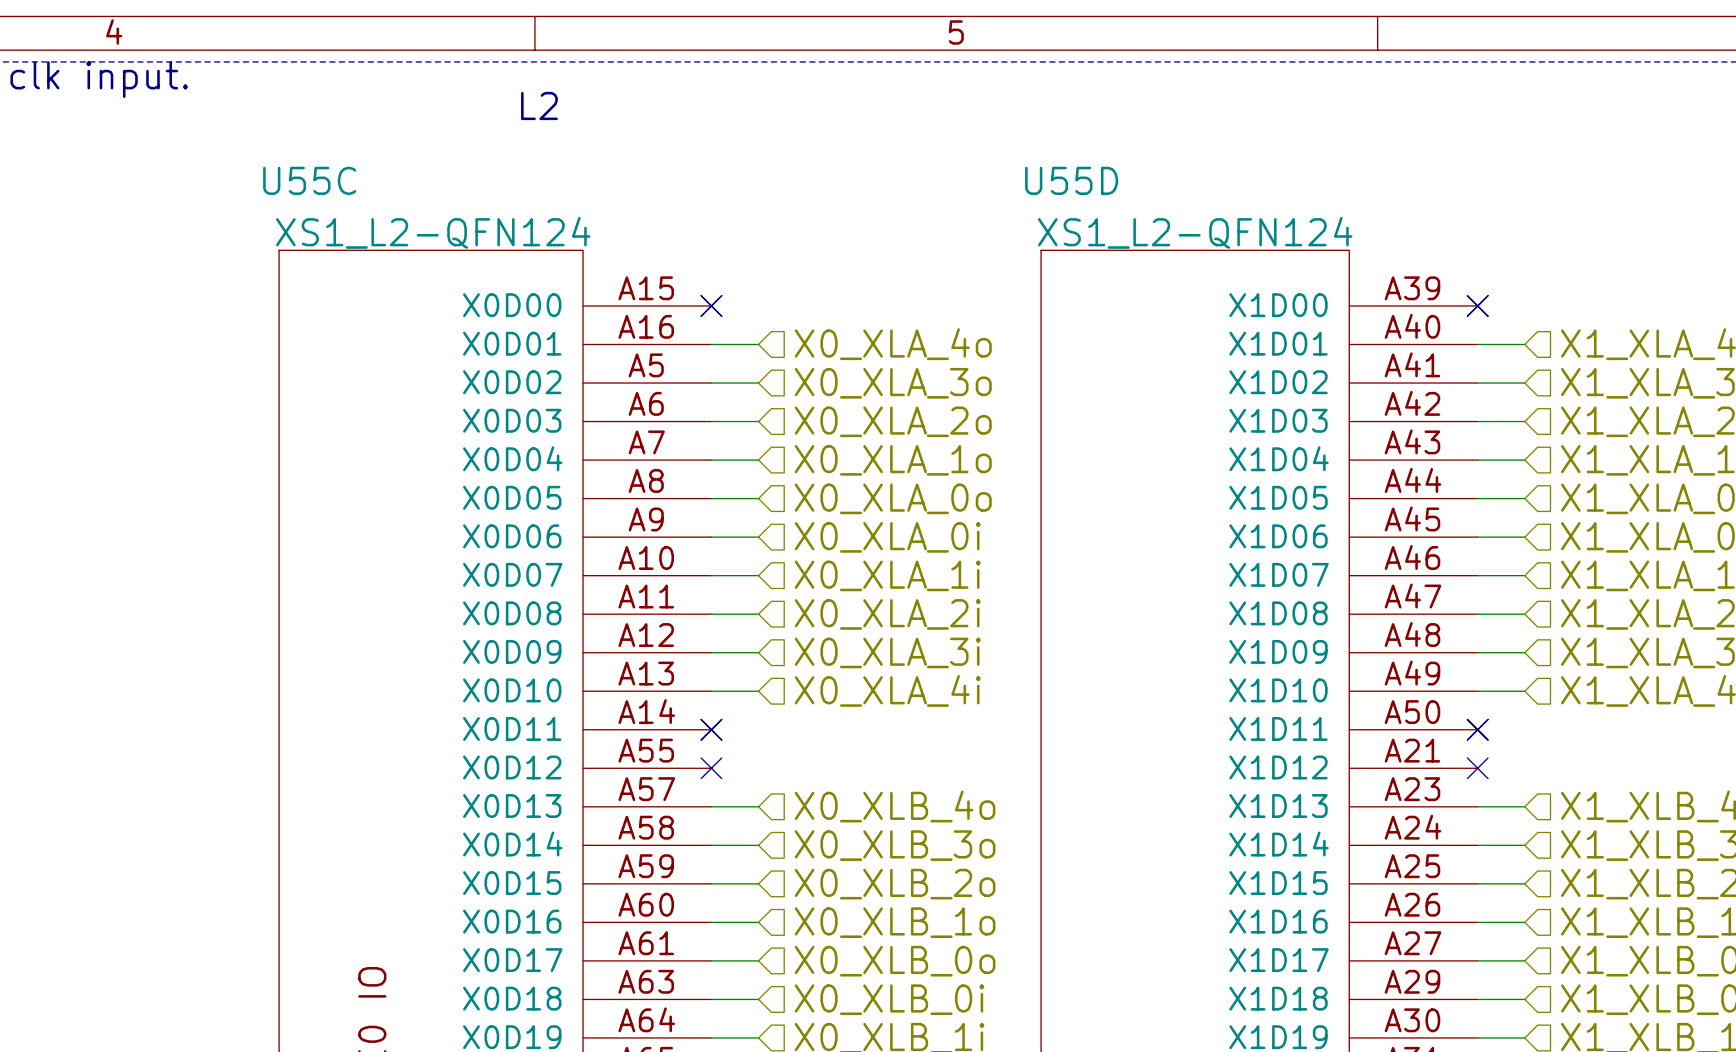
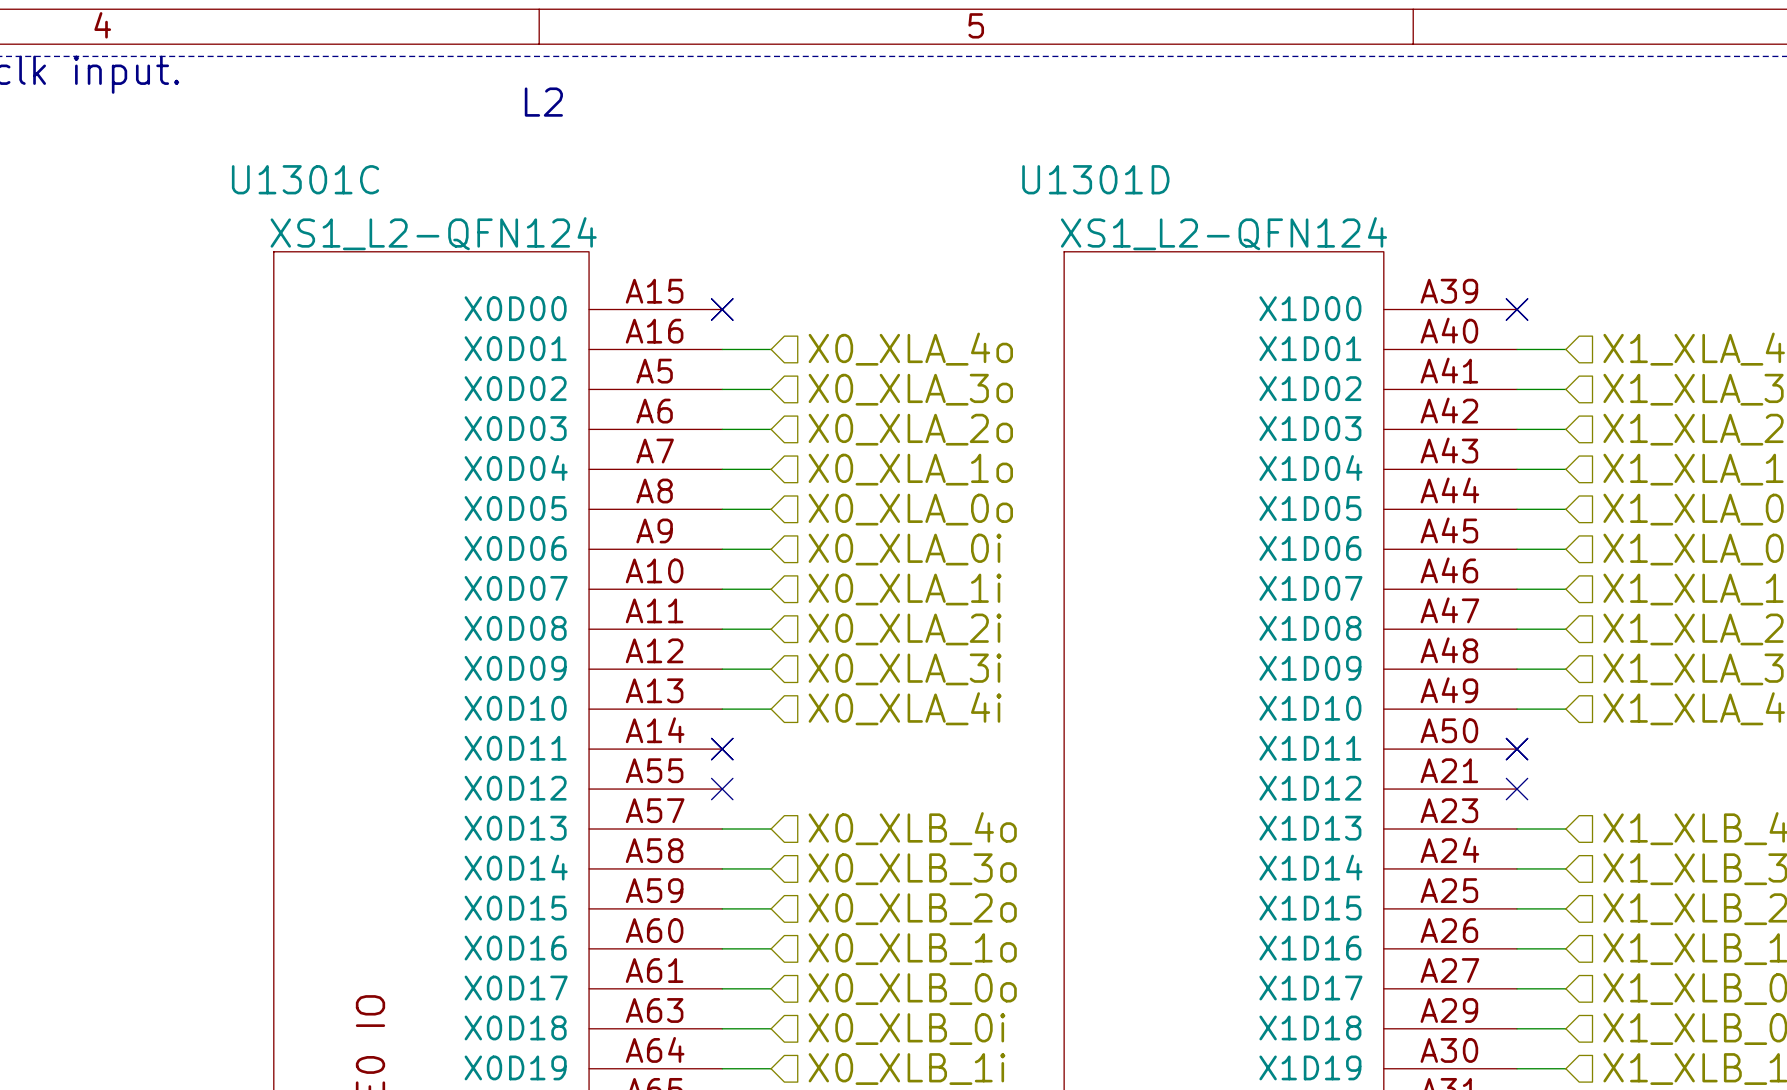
U55C name: U55C (309, 180) -> U1301C (305, 179)
U55D name: U55D (1071, 180) -> U1301D (1095, 179)

